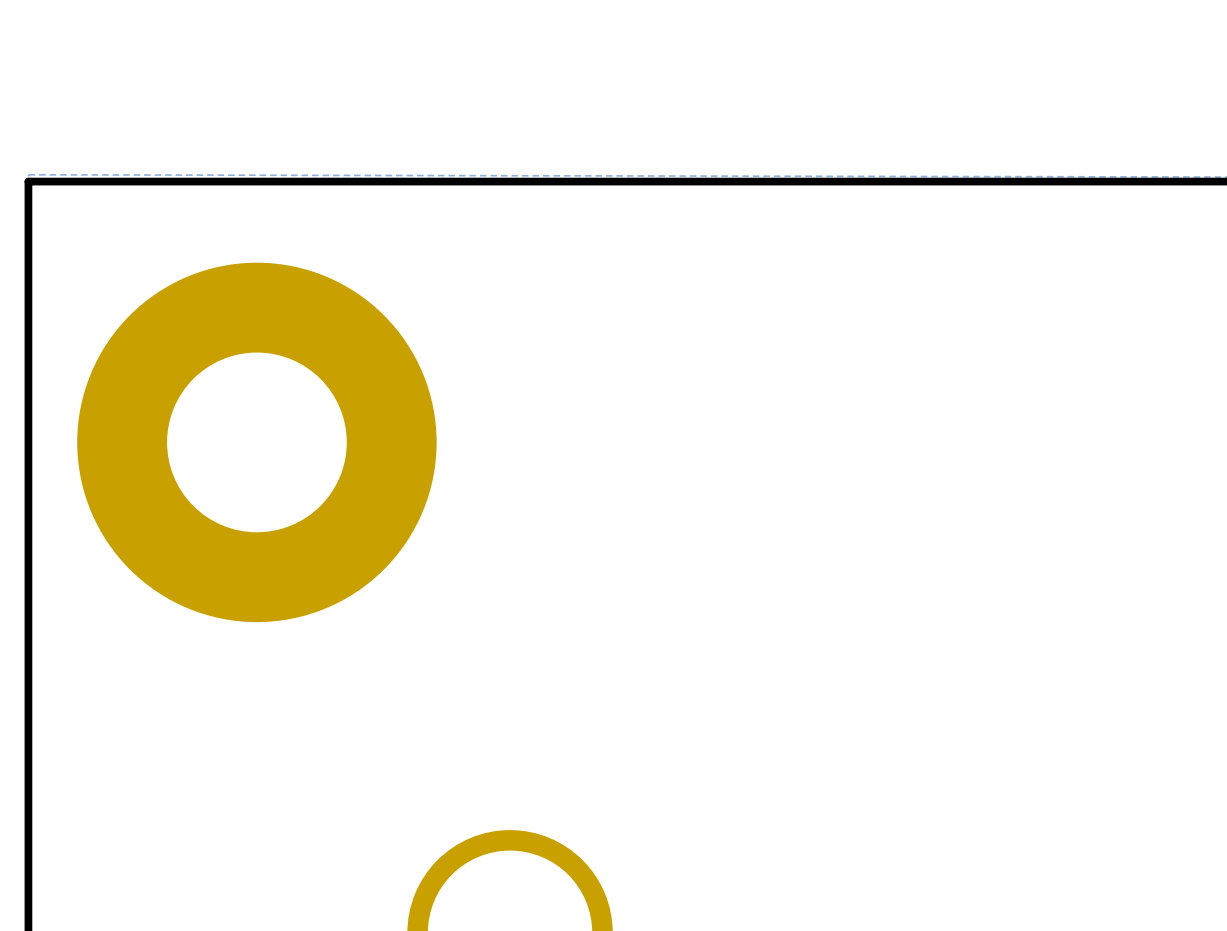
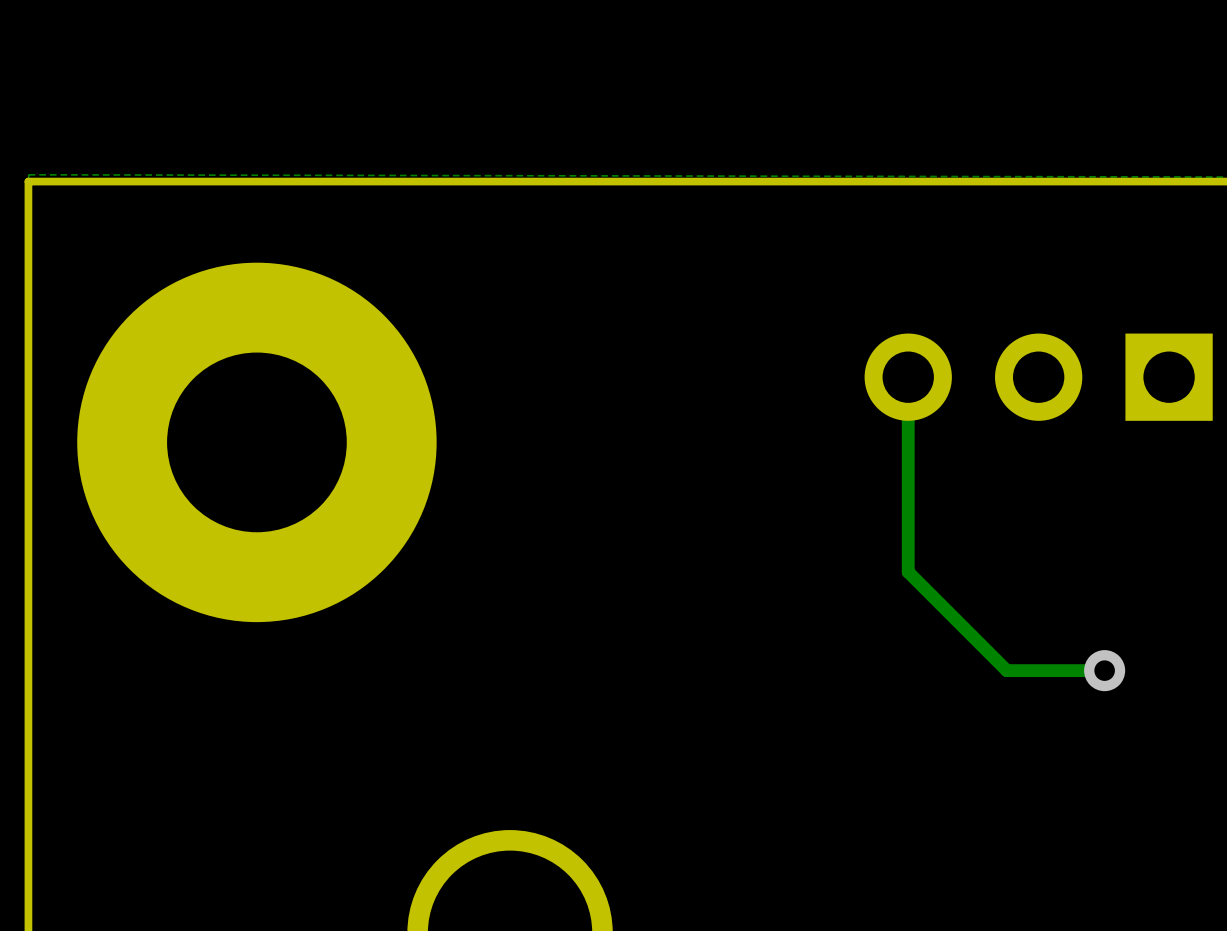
track: none -> (908, 377) (908, 572) (1006, 670) (1104, 670)
part: none -> (1038, 377)
via: none -> (1104, 670)

